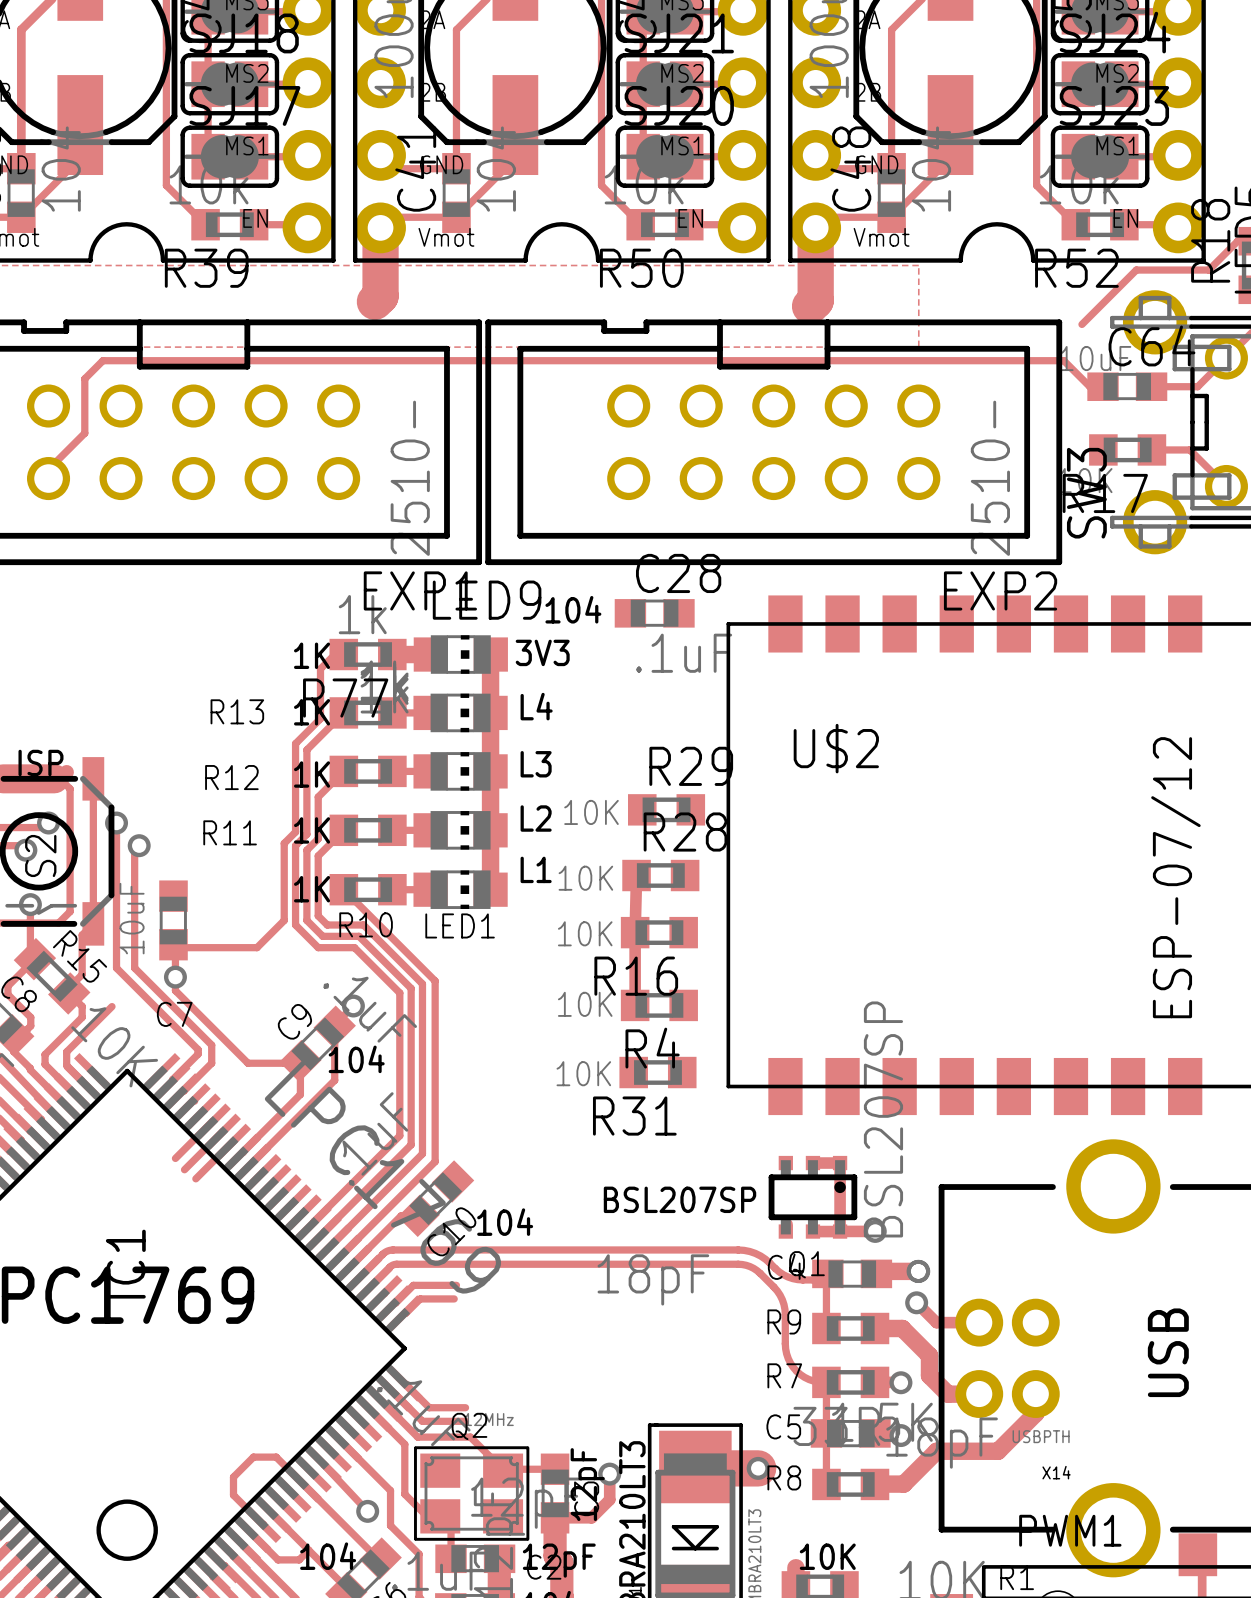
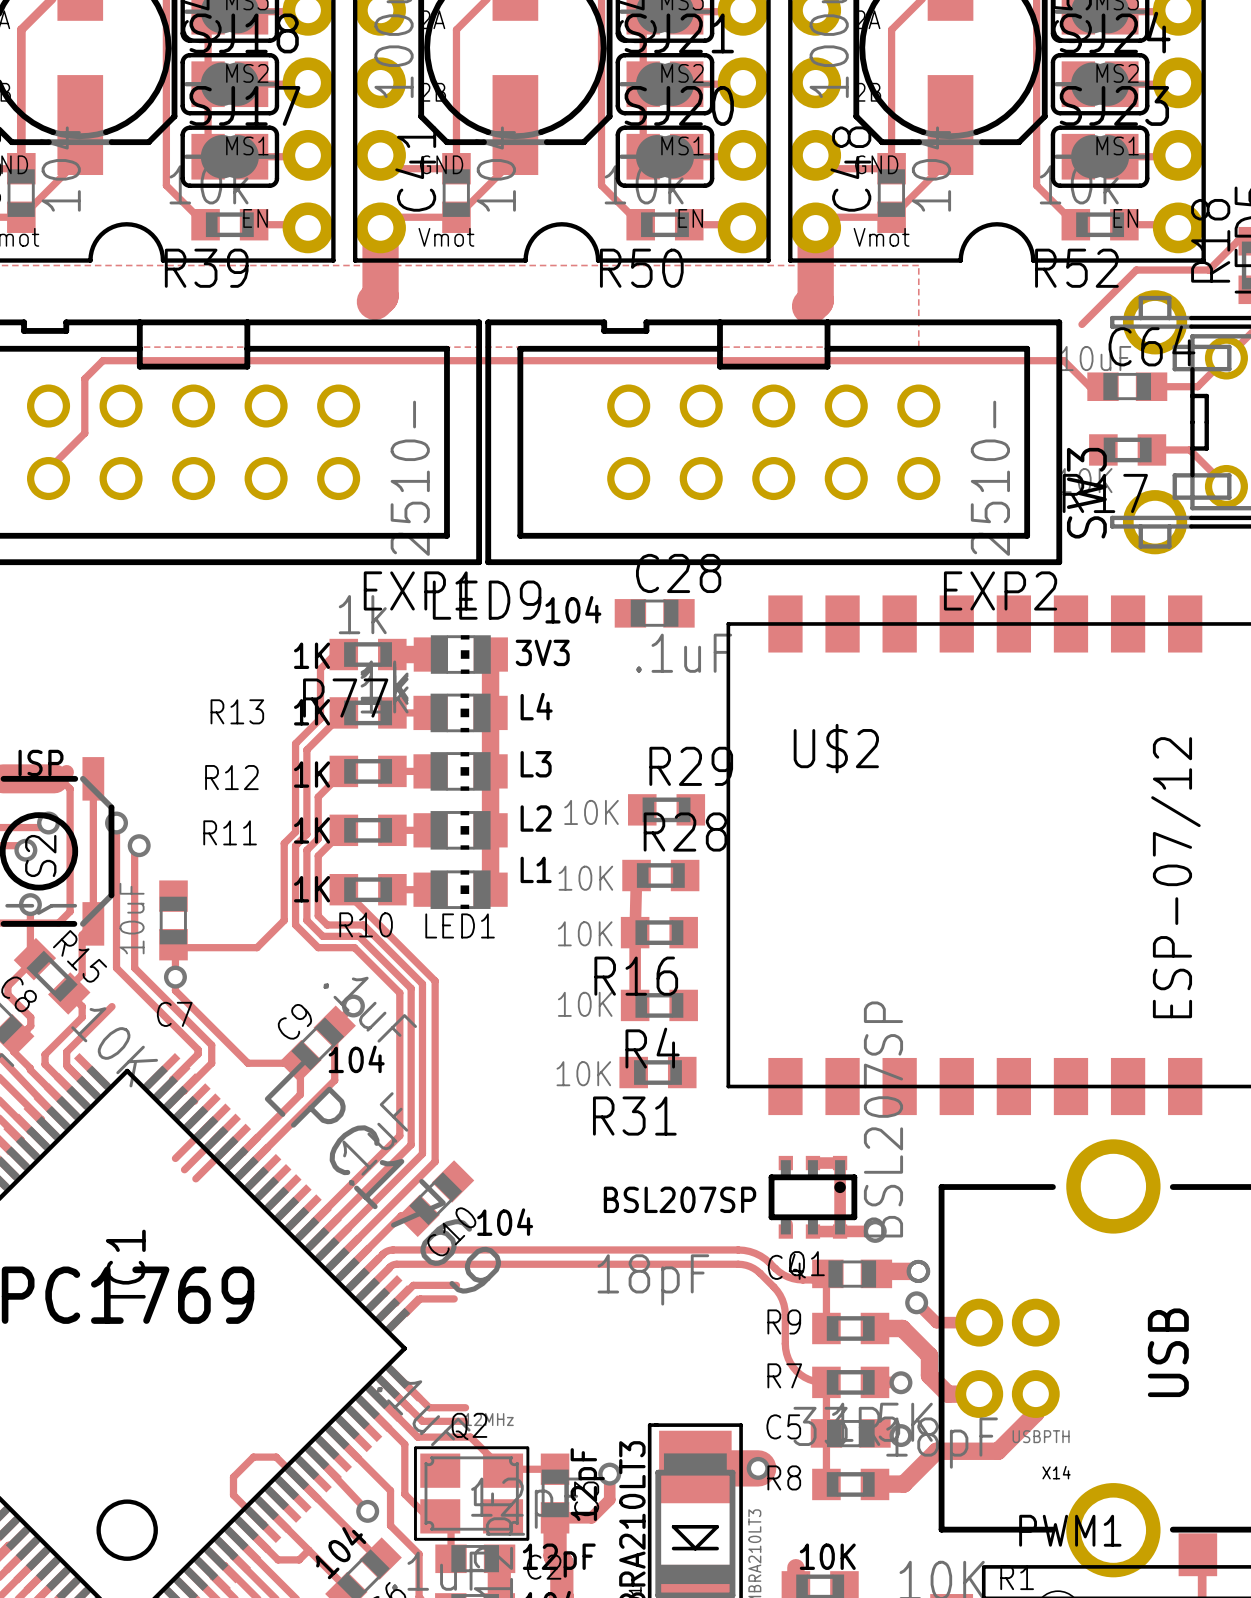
text rotation: 0° (328, 1556) -> 45° counterclockwise (340, 1553)

